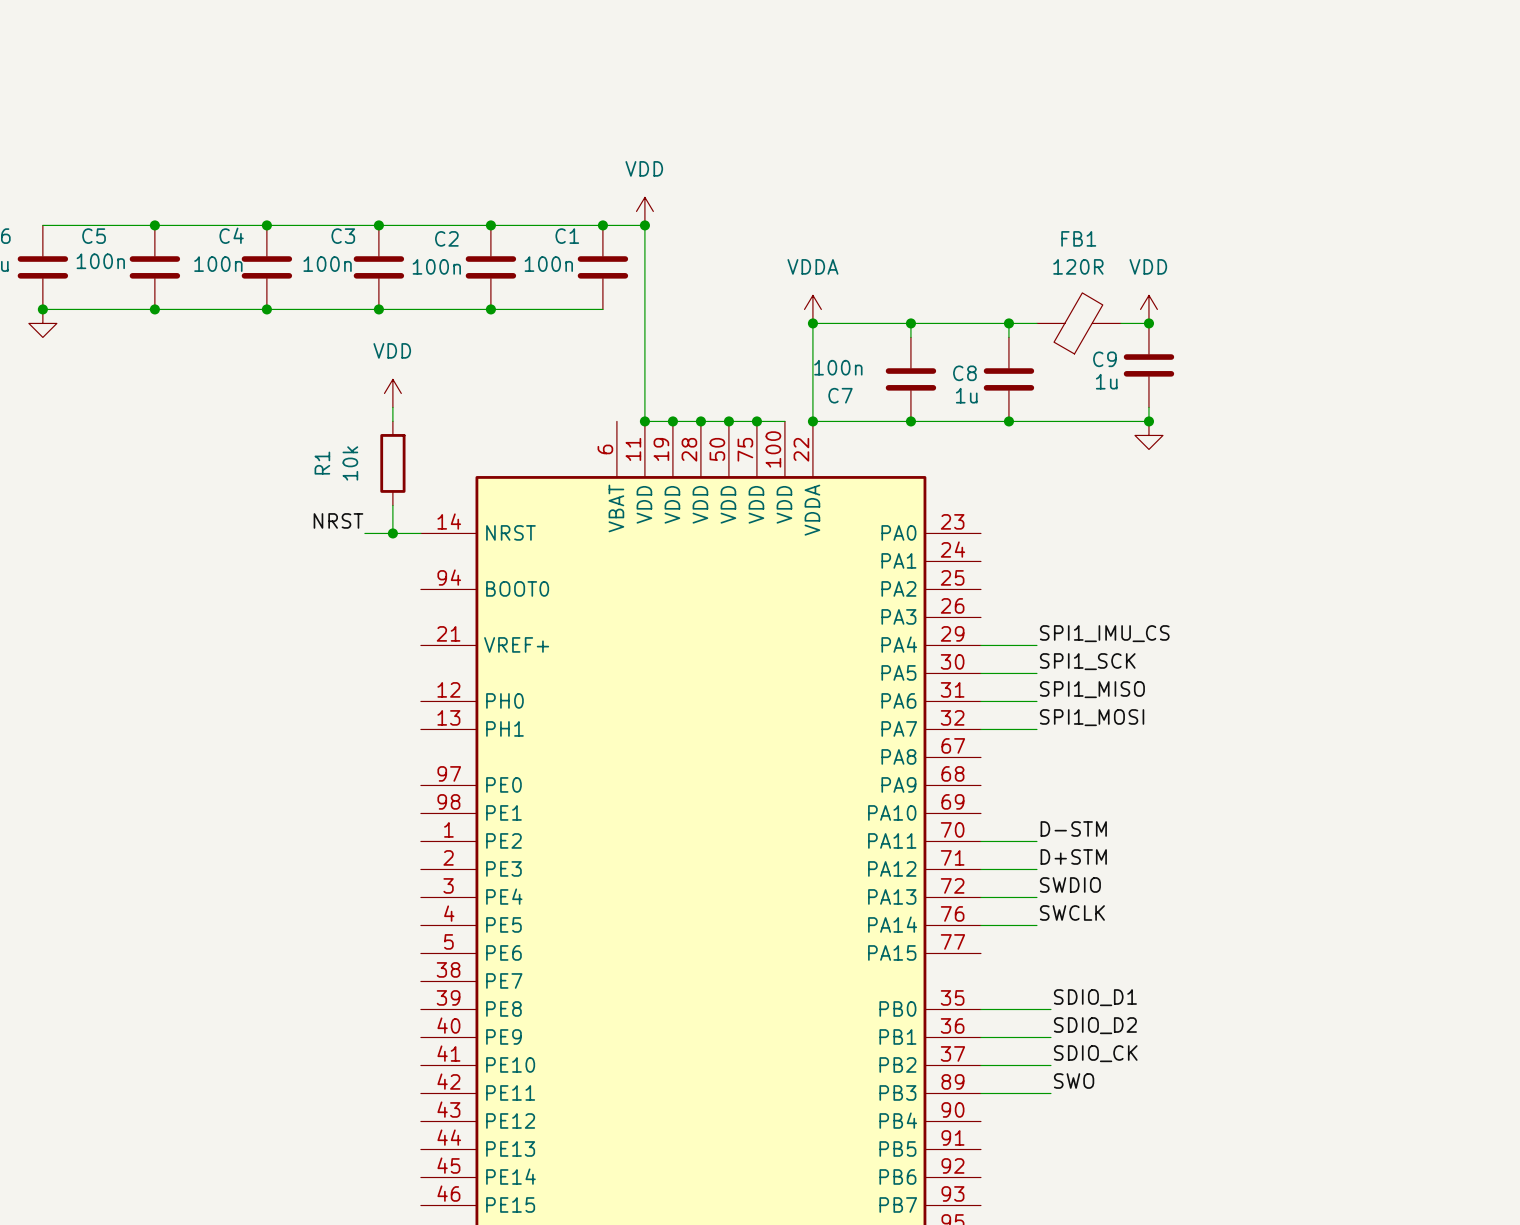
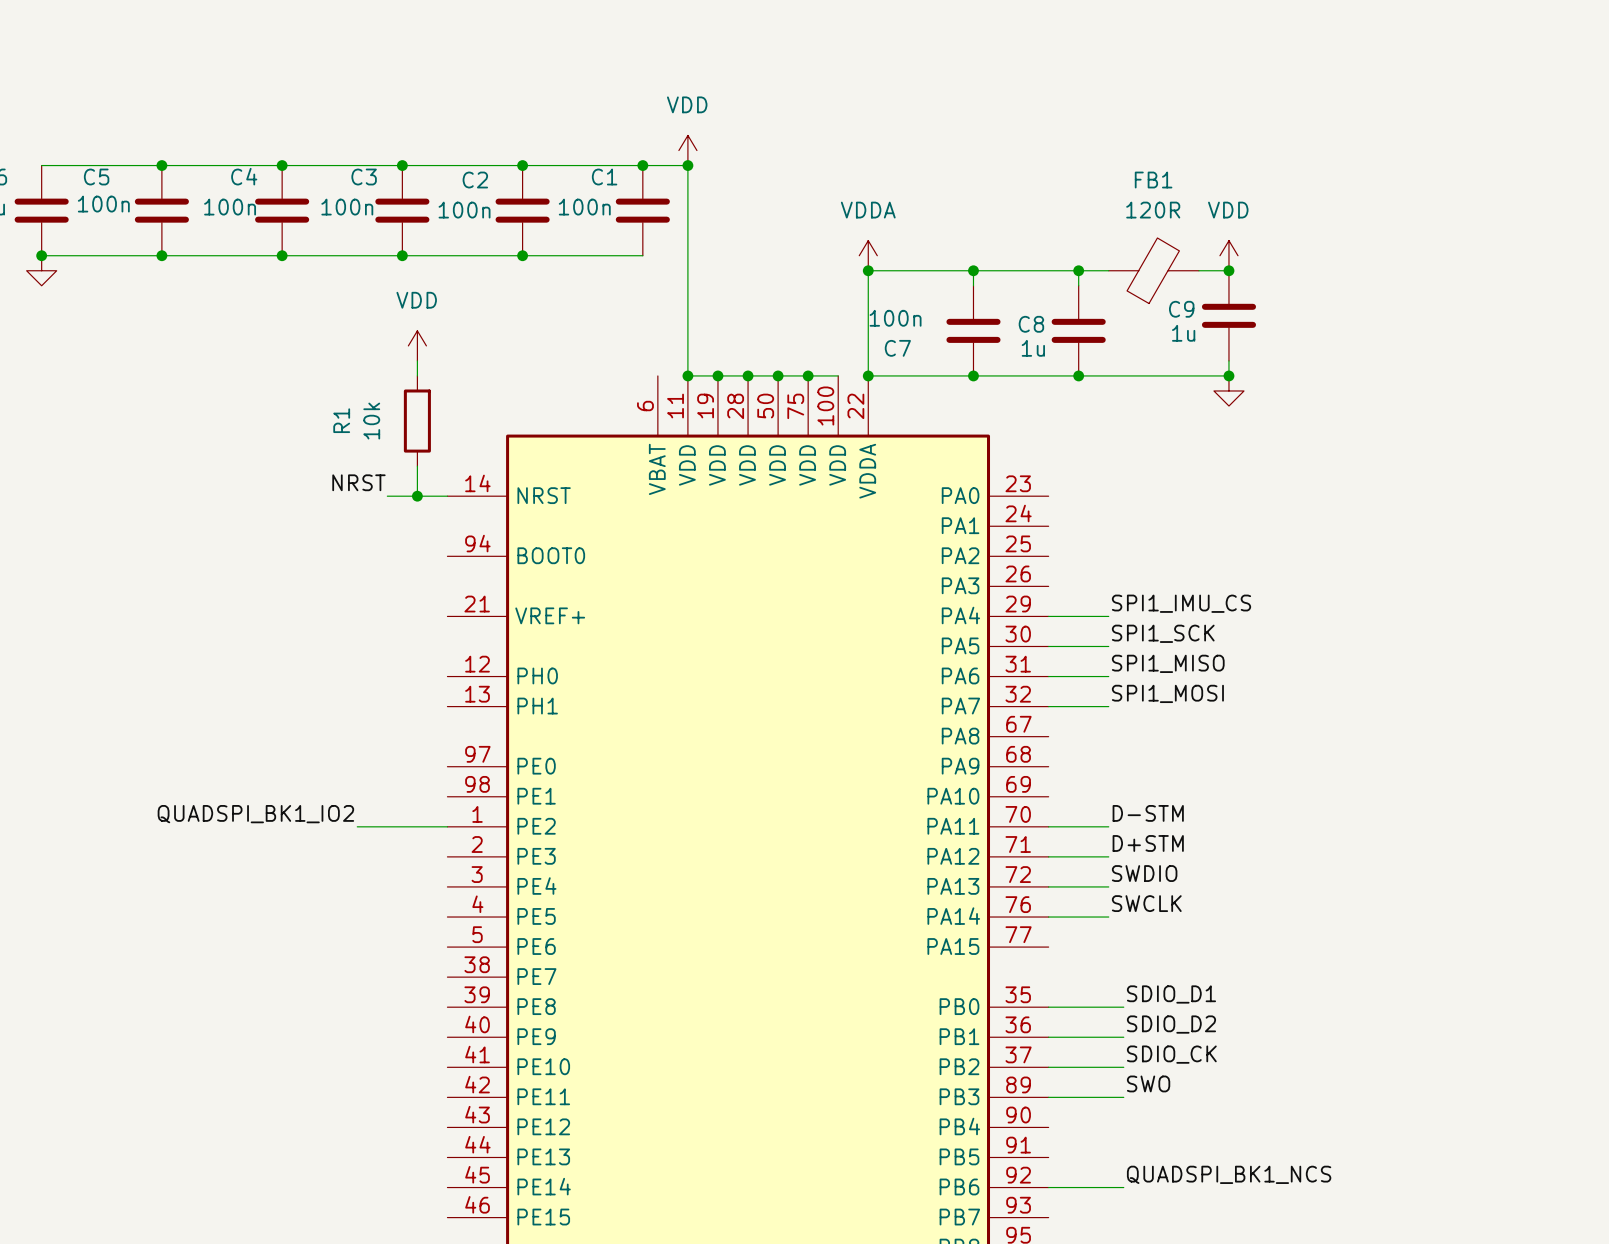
label: none -> QUADSPI_BK1_IO2 (255, 814)
wire: none -> (357, 826) (447, 826)
label: none -> QUADSPI_BK1_NCS (1229, 1174)
wire: none -> (1048, 1187) (1123, 1187)

